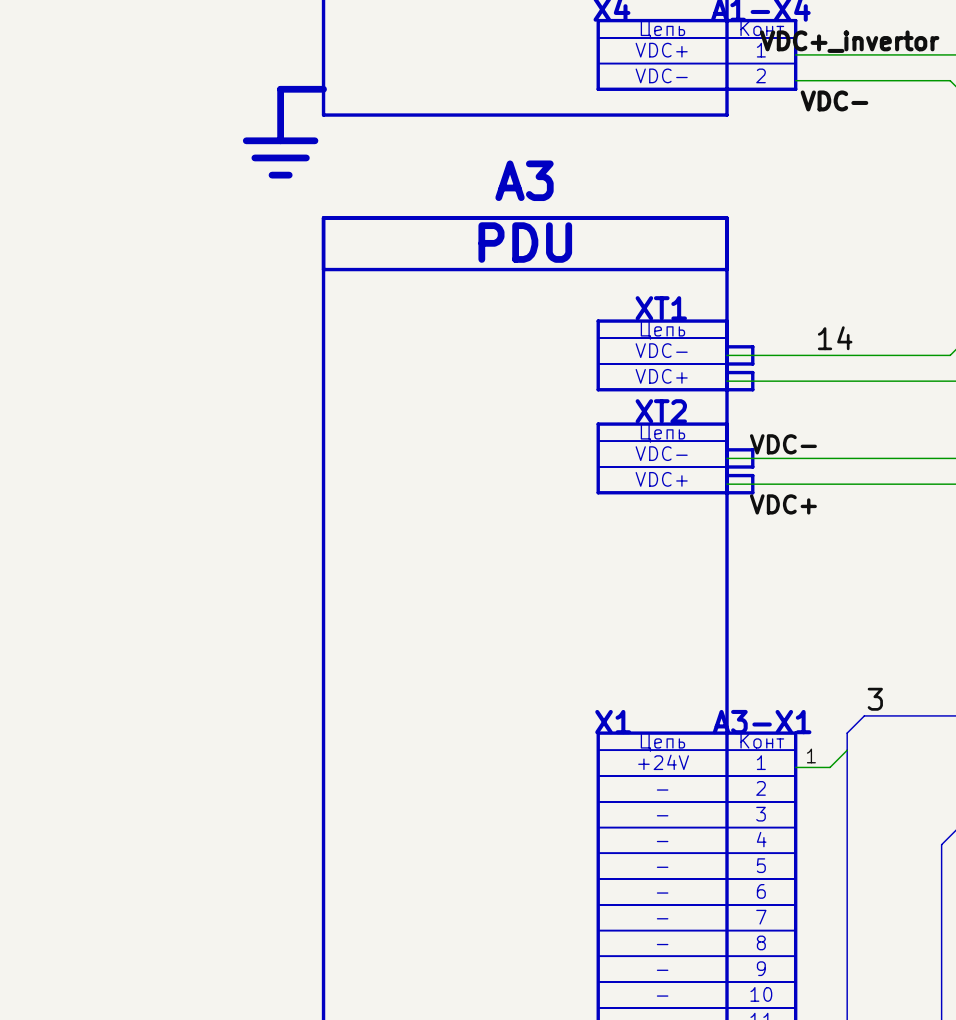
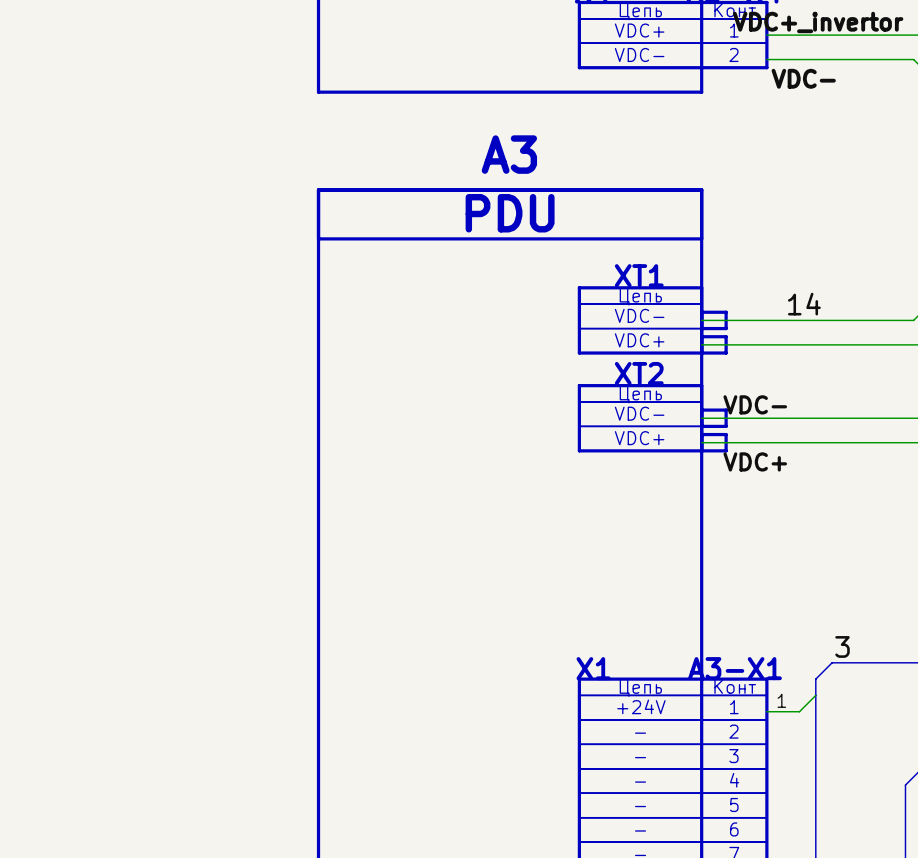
line: (323, 89) (280, 89) (280, 140) -> none
line: (246, 140) (314, 140) -> none
line: (254, 157) (306, 157) -> none
line: (272, 175) (289, 175) -> none

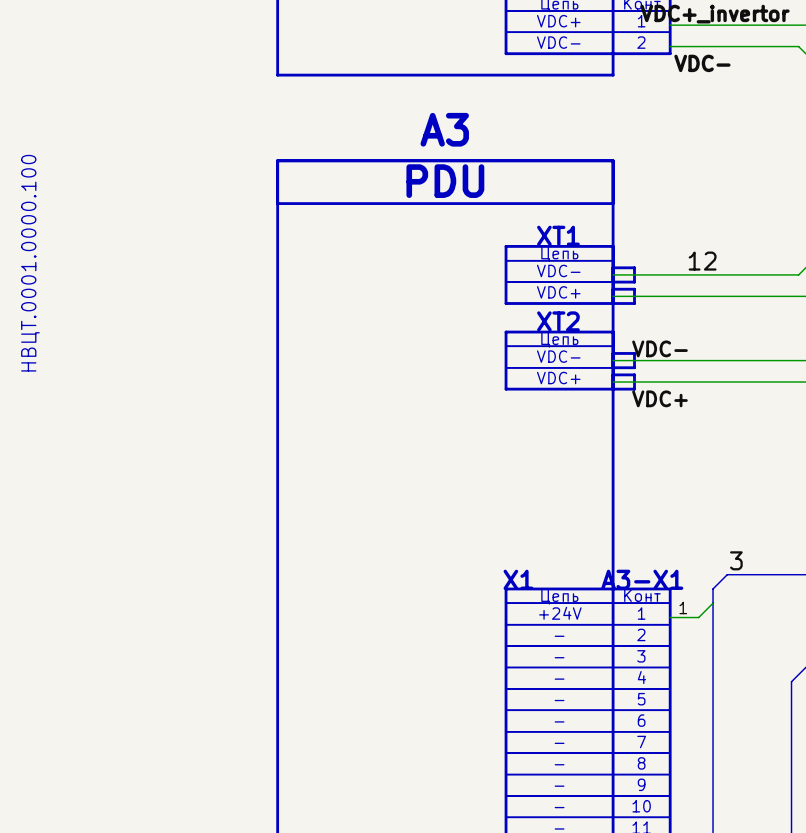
label: 14 (804, 304) -> 12 (702, 261)
text: none -> НВЦТ.0001.0000.100 (30, 263)

